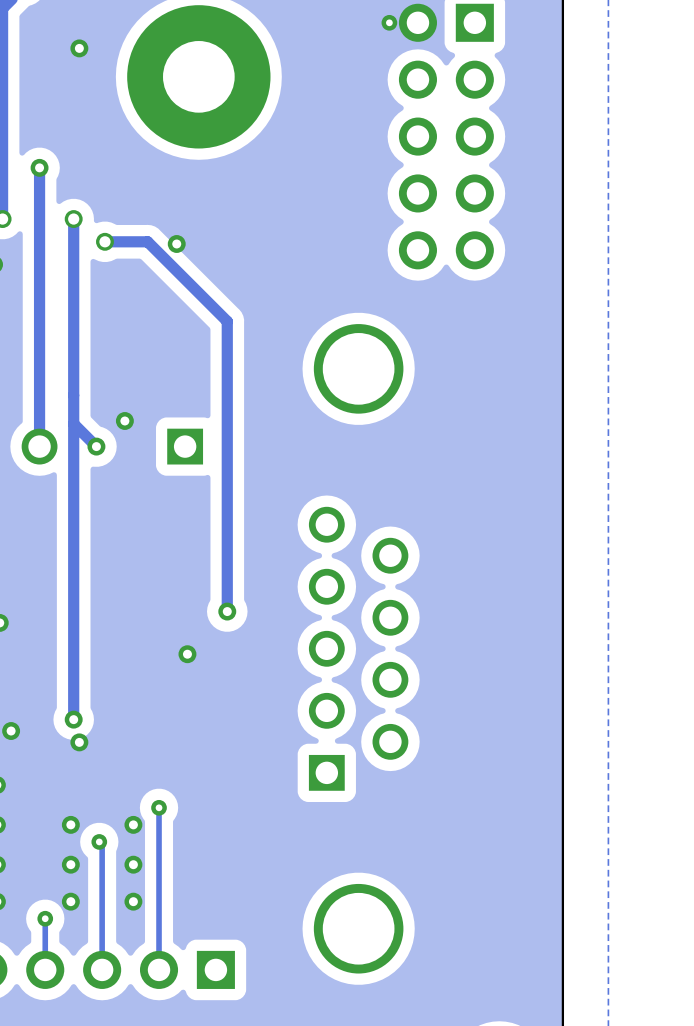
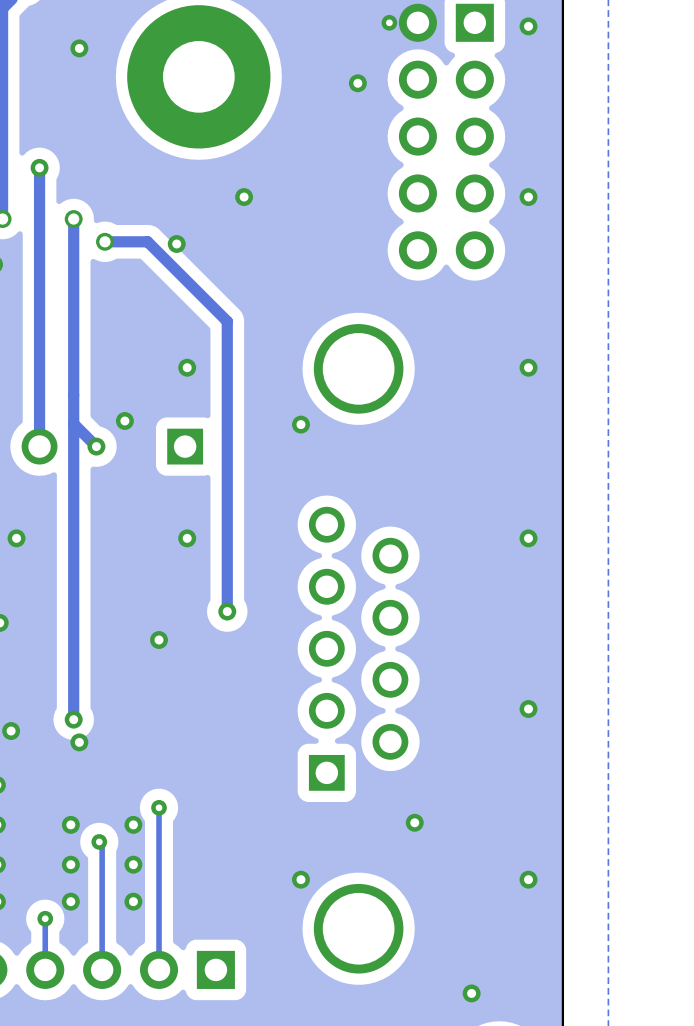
via: none -> (528, 26)
via: none -> (357, 83)
via: none -> (244, 197)
via: none -> (528, 197)
via: none -> (187, 367)
via: none -> (528, 367)
via: none -> (300, 424)
via: none -> (16, 538)
via: none -> (187, 538)
via: none -> (528, 538)
via position: (187, 654) -> (159, 639)
via: none -> (528, 709)
via: none -> (414, 822)
via: none -> (300, 879)
via: none -> (528, 879)
via: none -> (471, 993)

